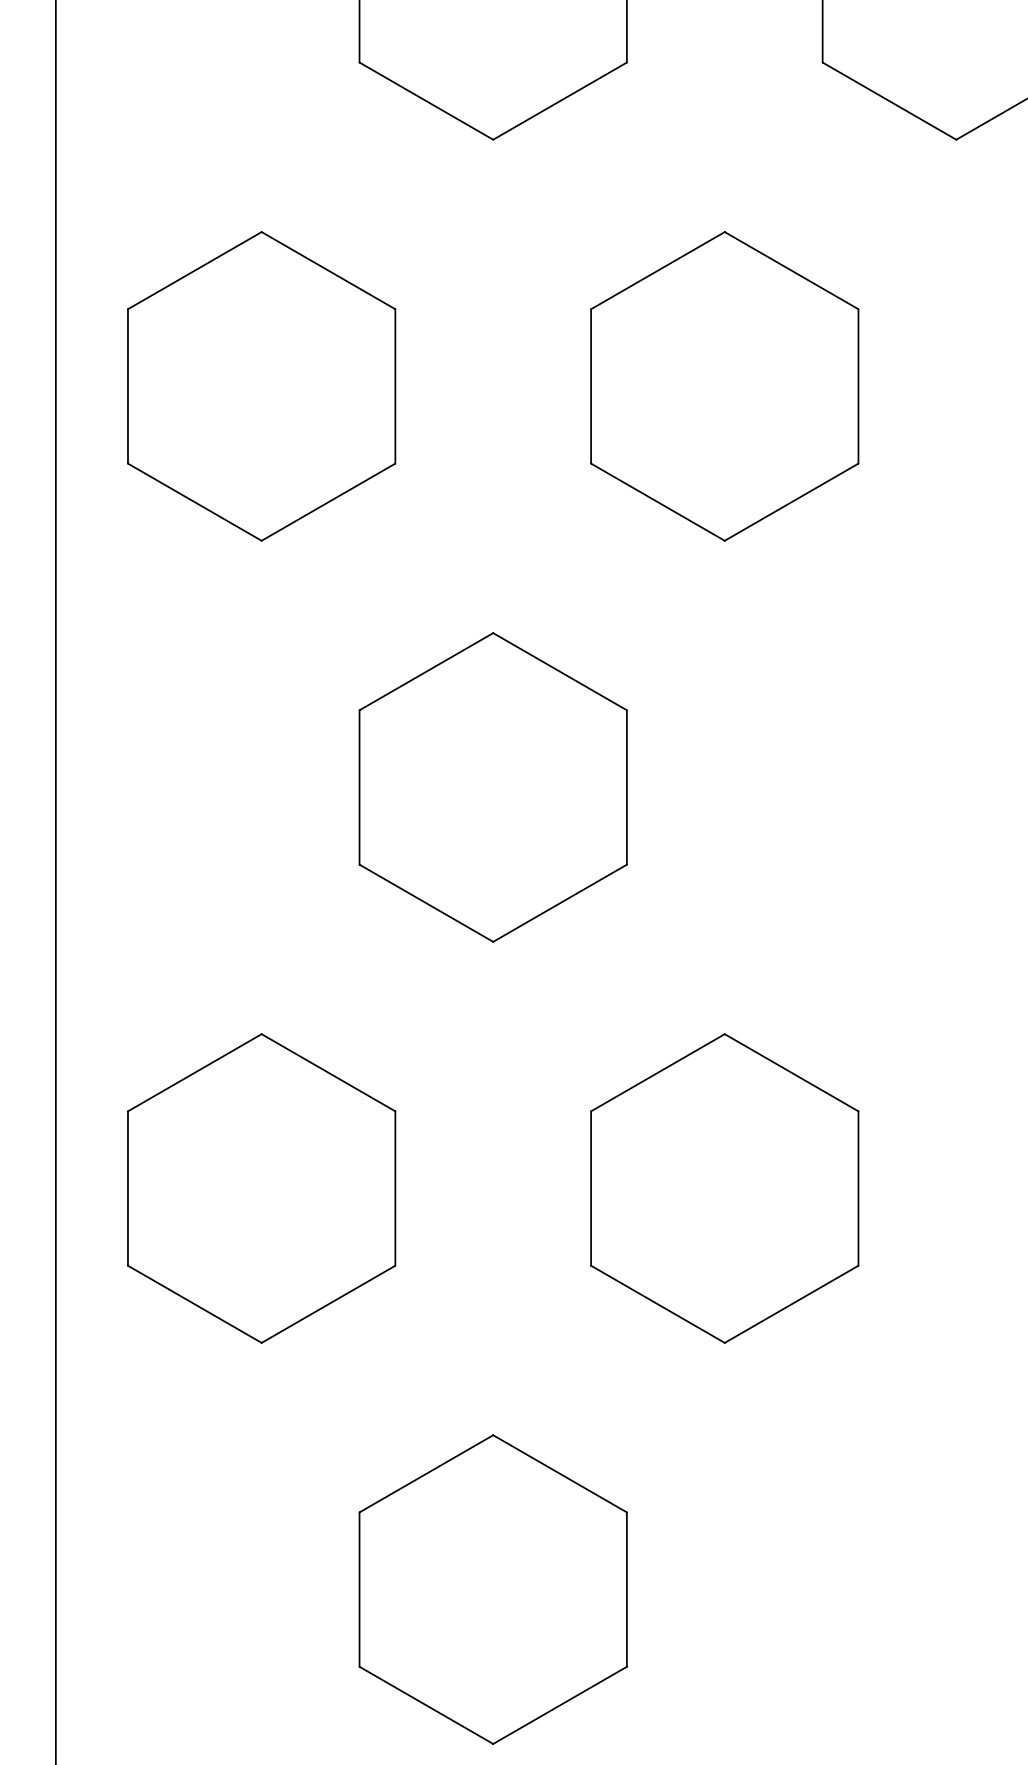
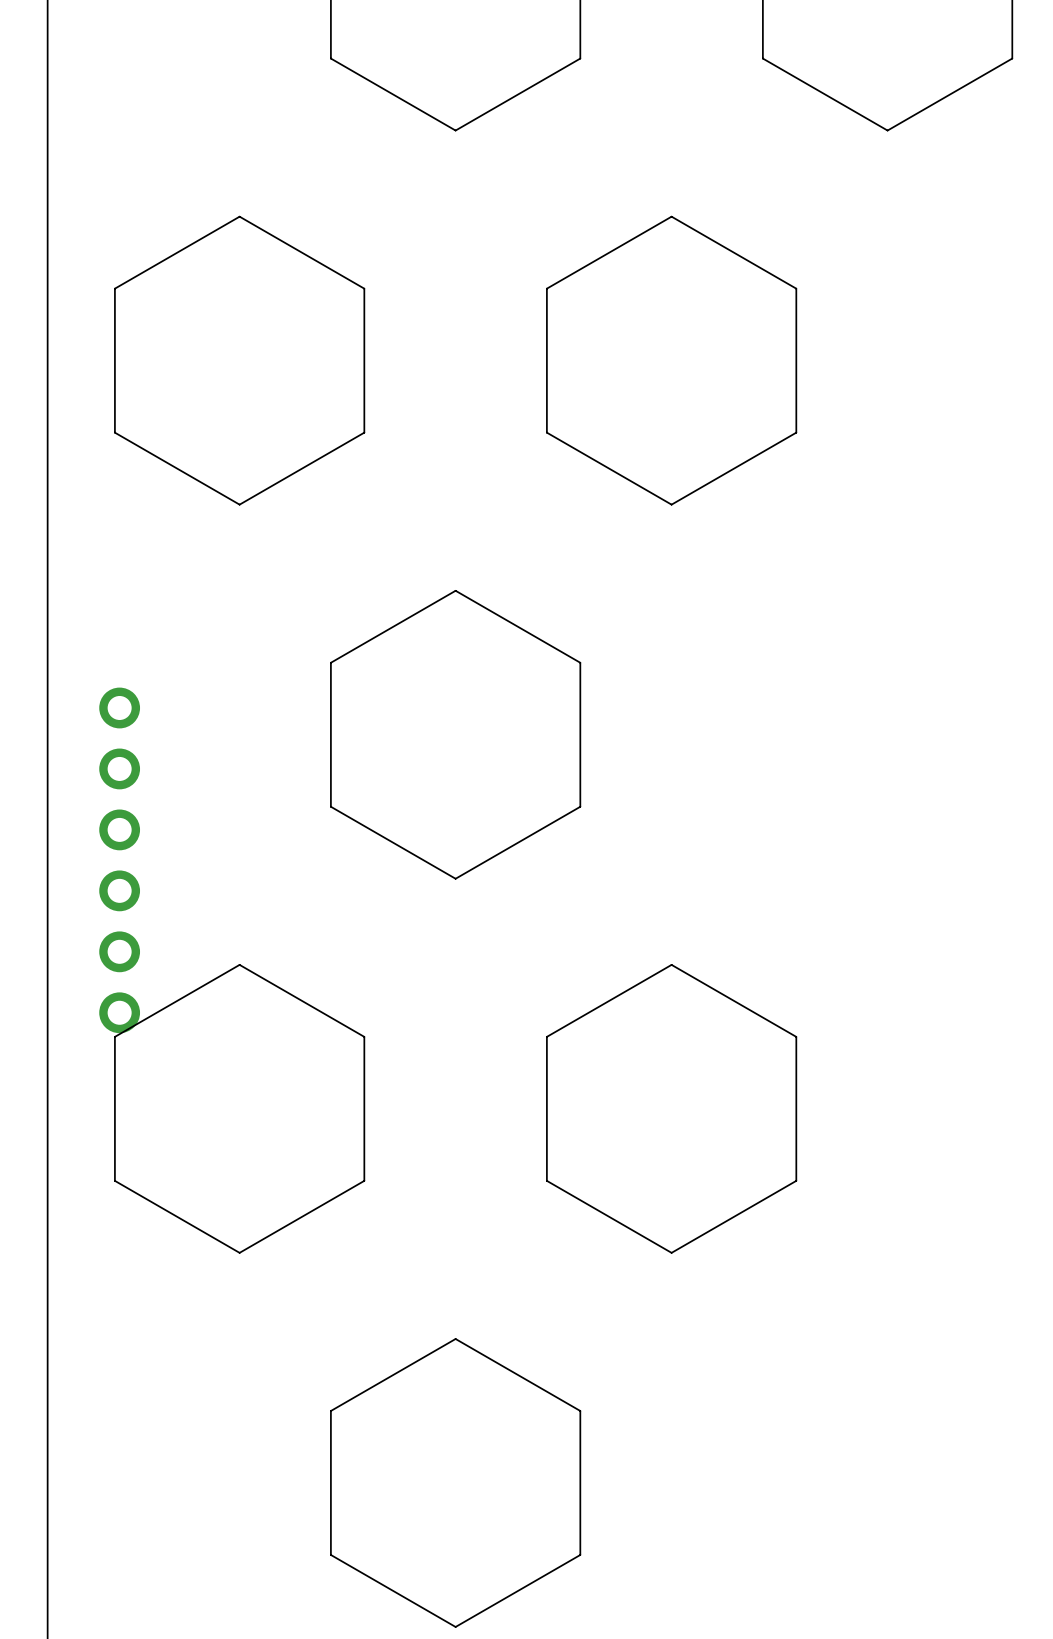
part: none -> (119, 707)
part: none -> (119, 768)
part: none -> (119, 829)
part: none -> (119, 890)
part: none -> (119, 951)
part: none -> (119, 1012)

